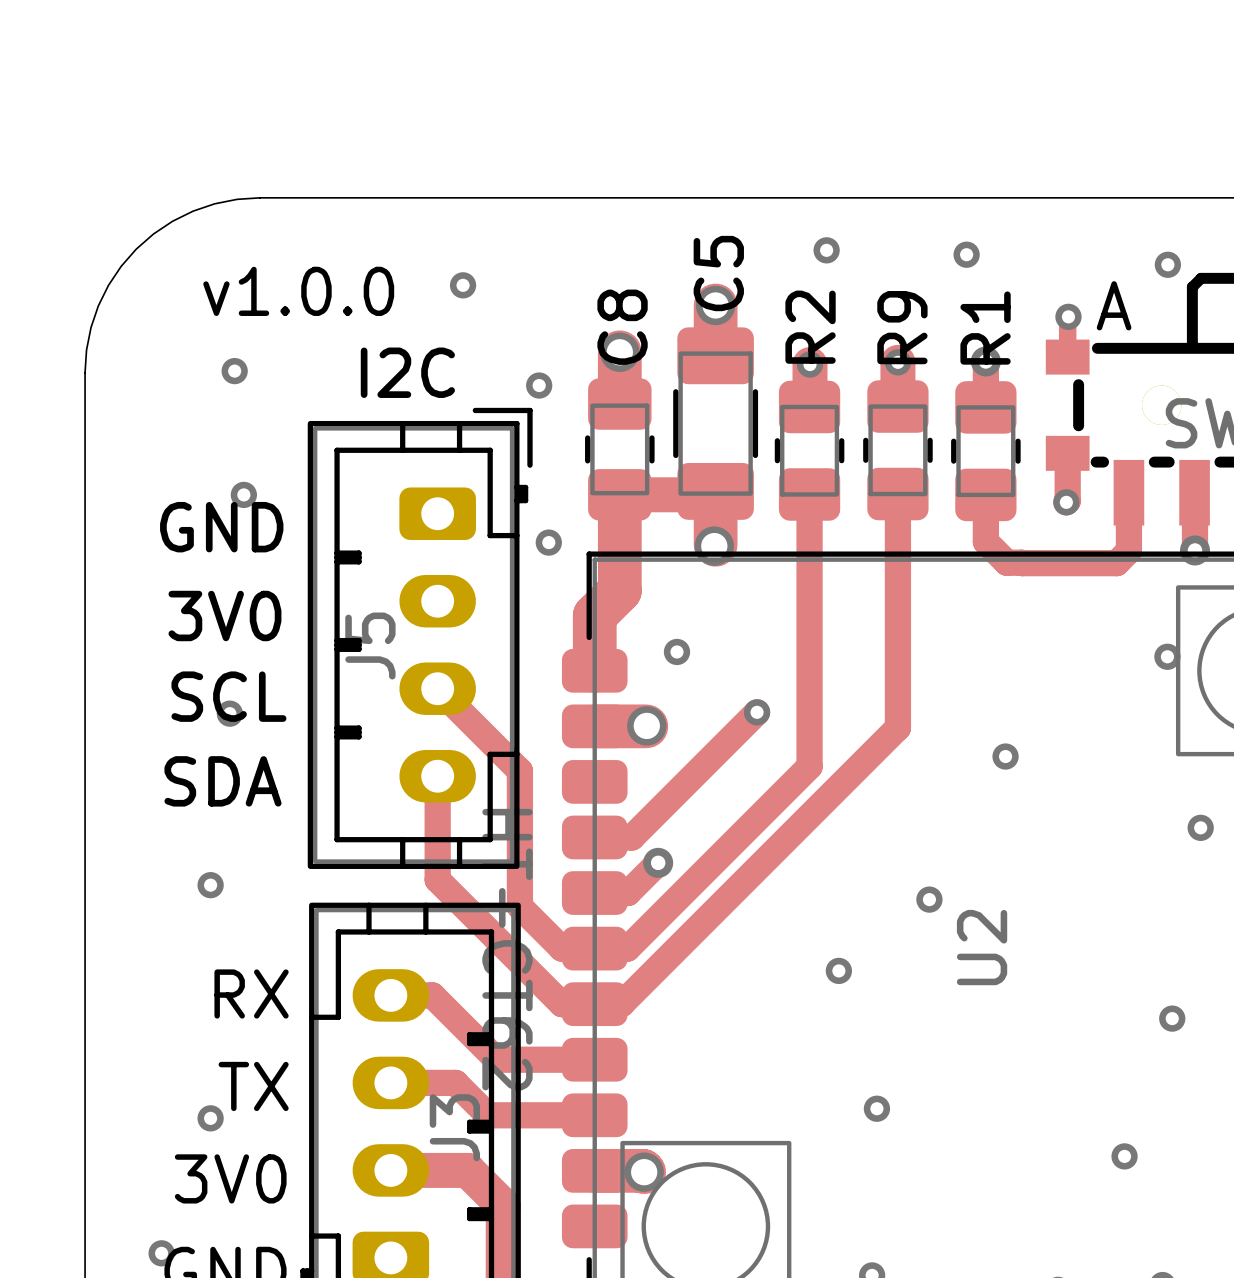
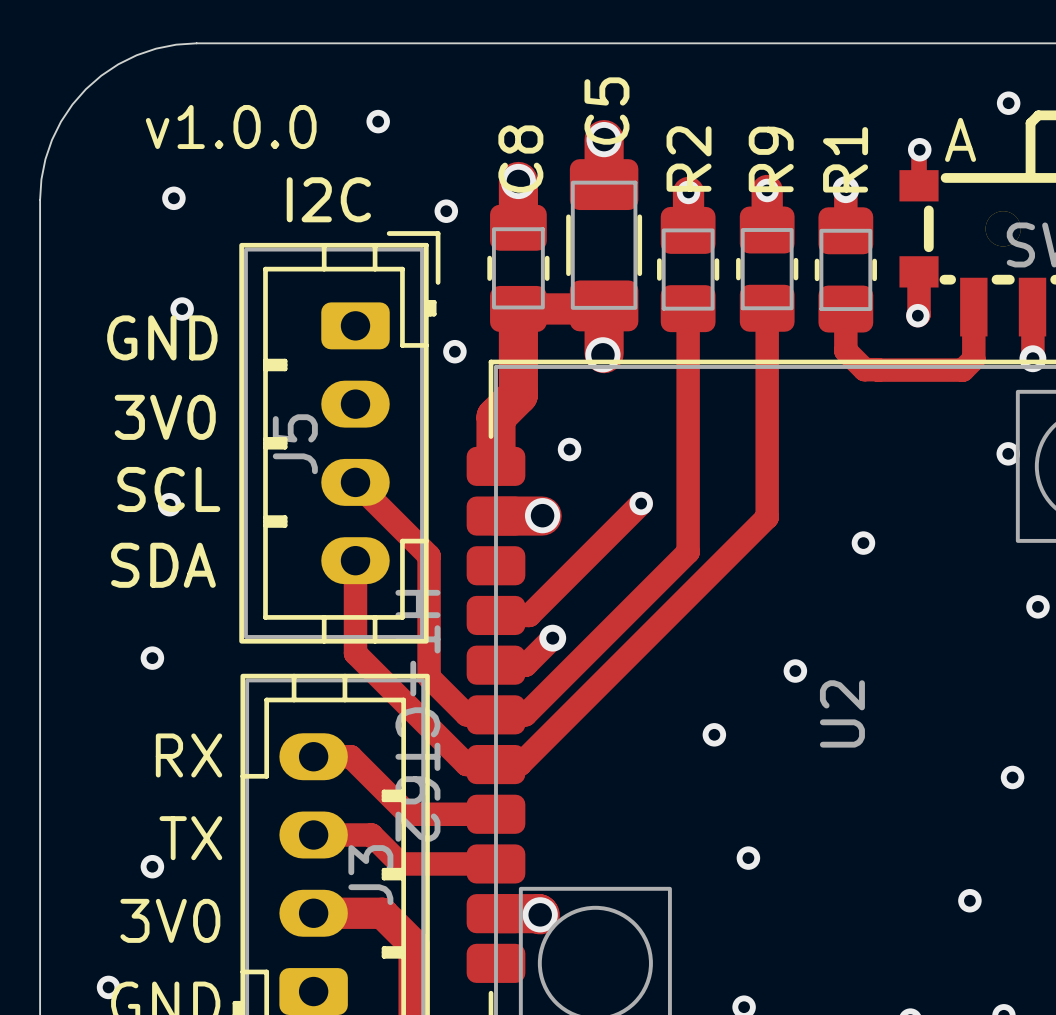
via: (826, 250) -> none
via: (966, 254) -> none

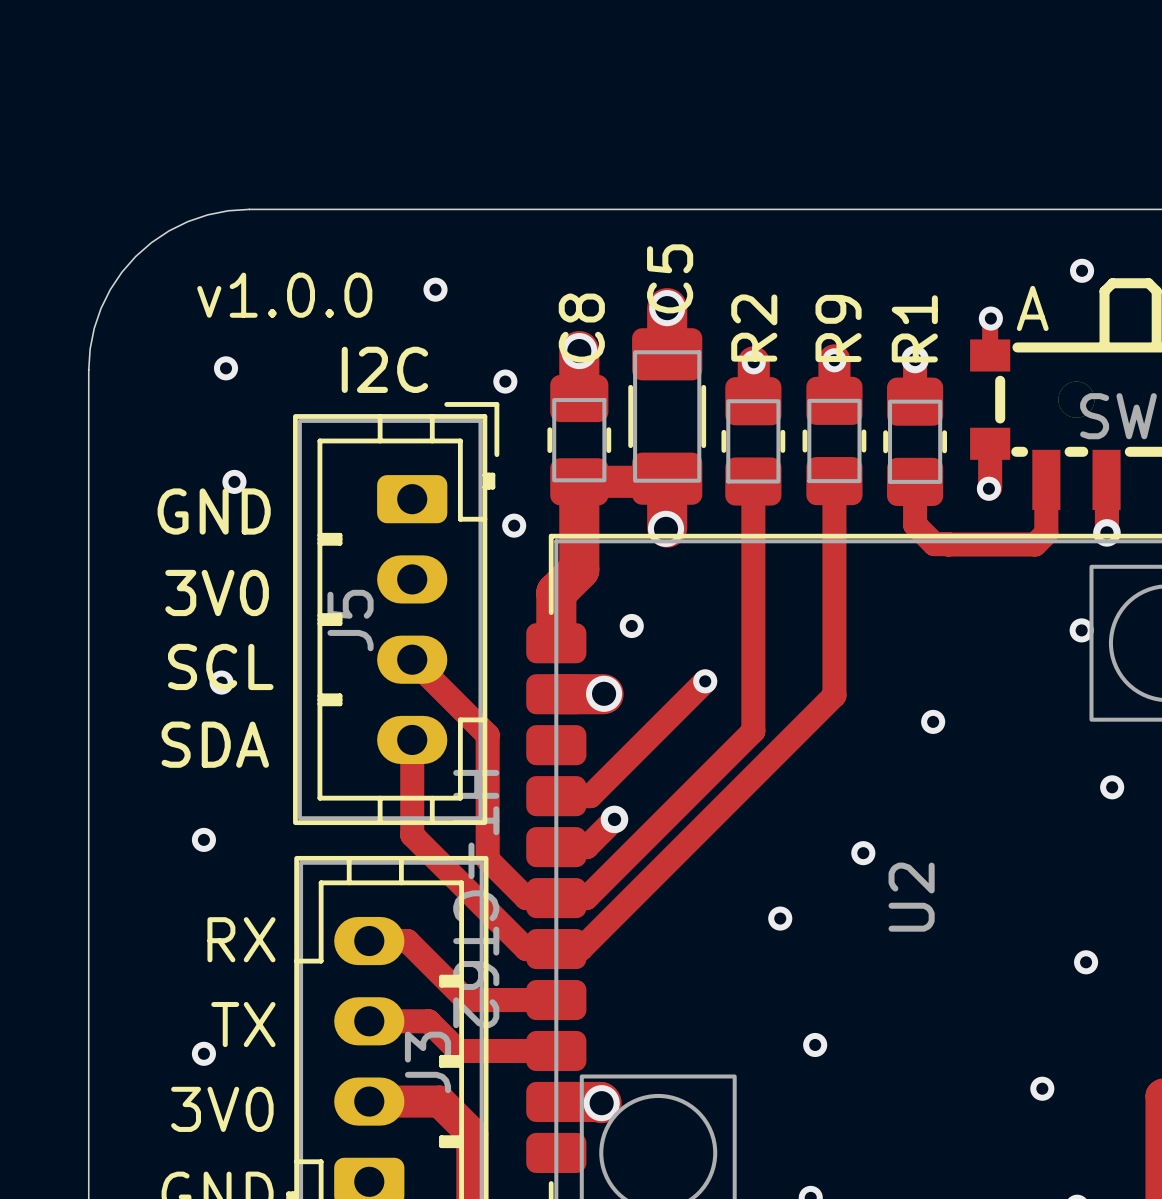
via: (108, 987) -> none

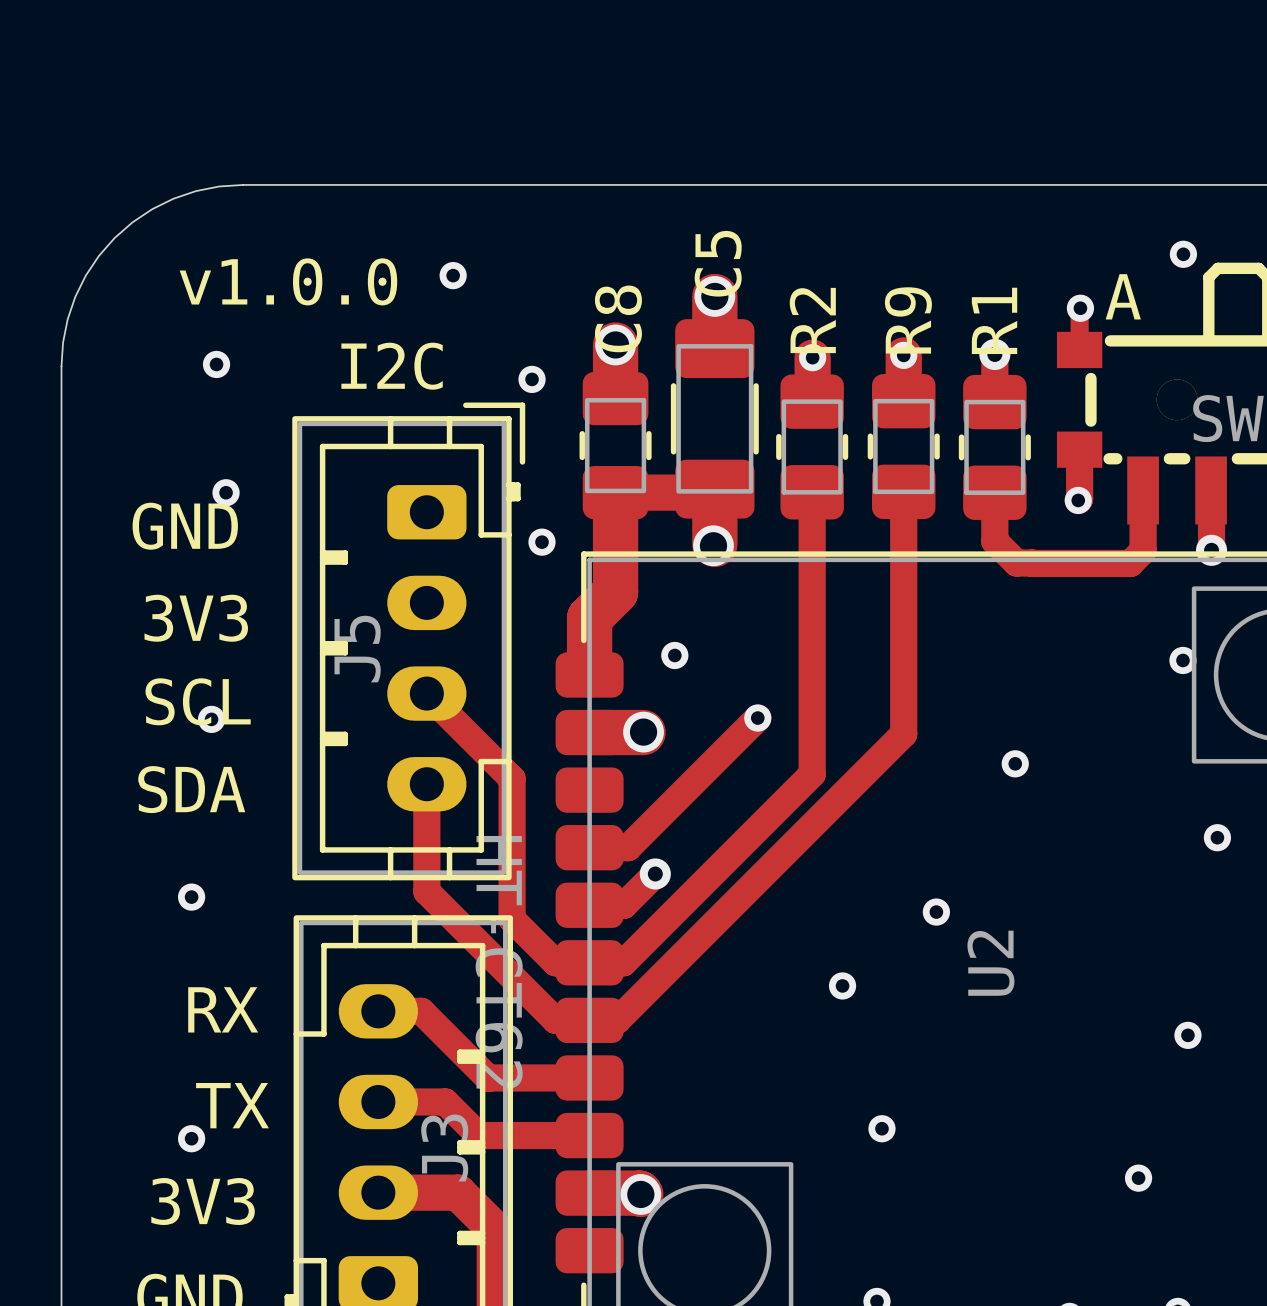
text: 3V0 (217, 592) -> 3V3 (196, 618)
text: 3V0 (222, 1109) -> 3V3 (203, 1201)

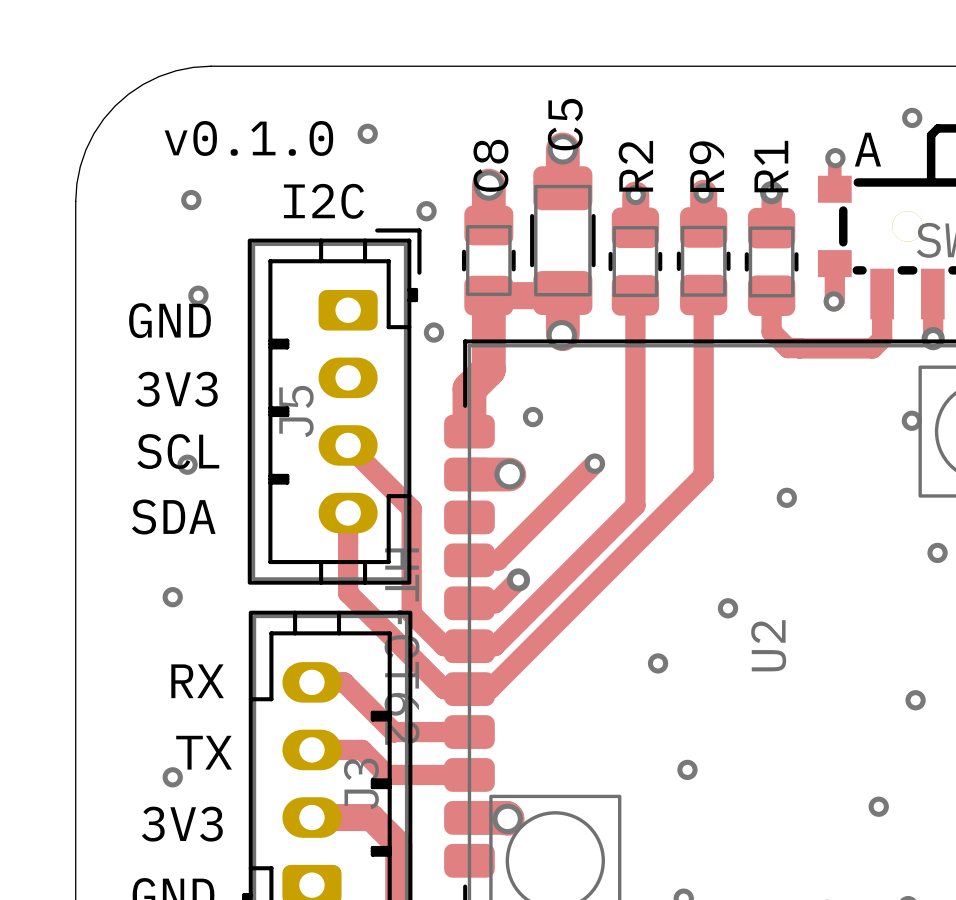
text: v1.0.0 (288, 281) -> v0.1.0 (248, 138)

